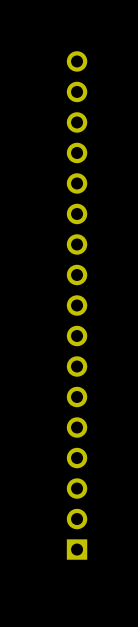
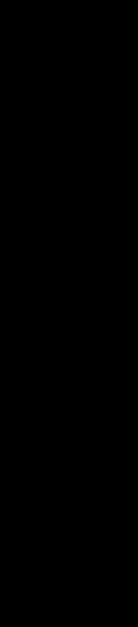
part: (77, 305) -> none

